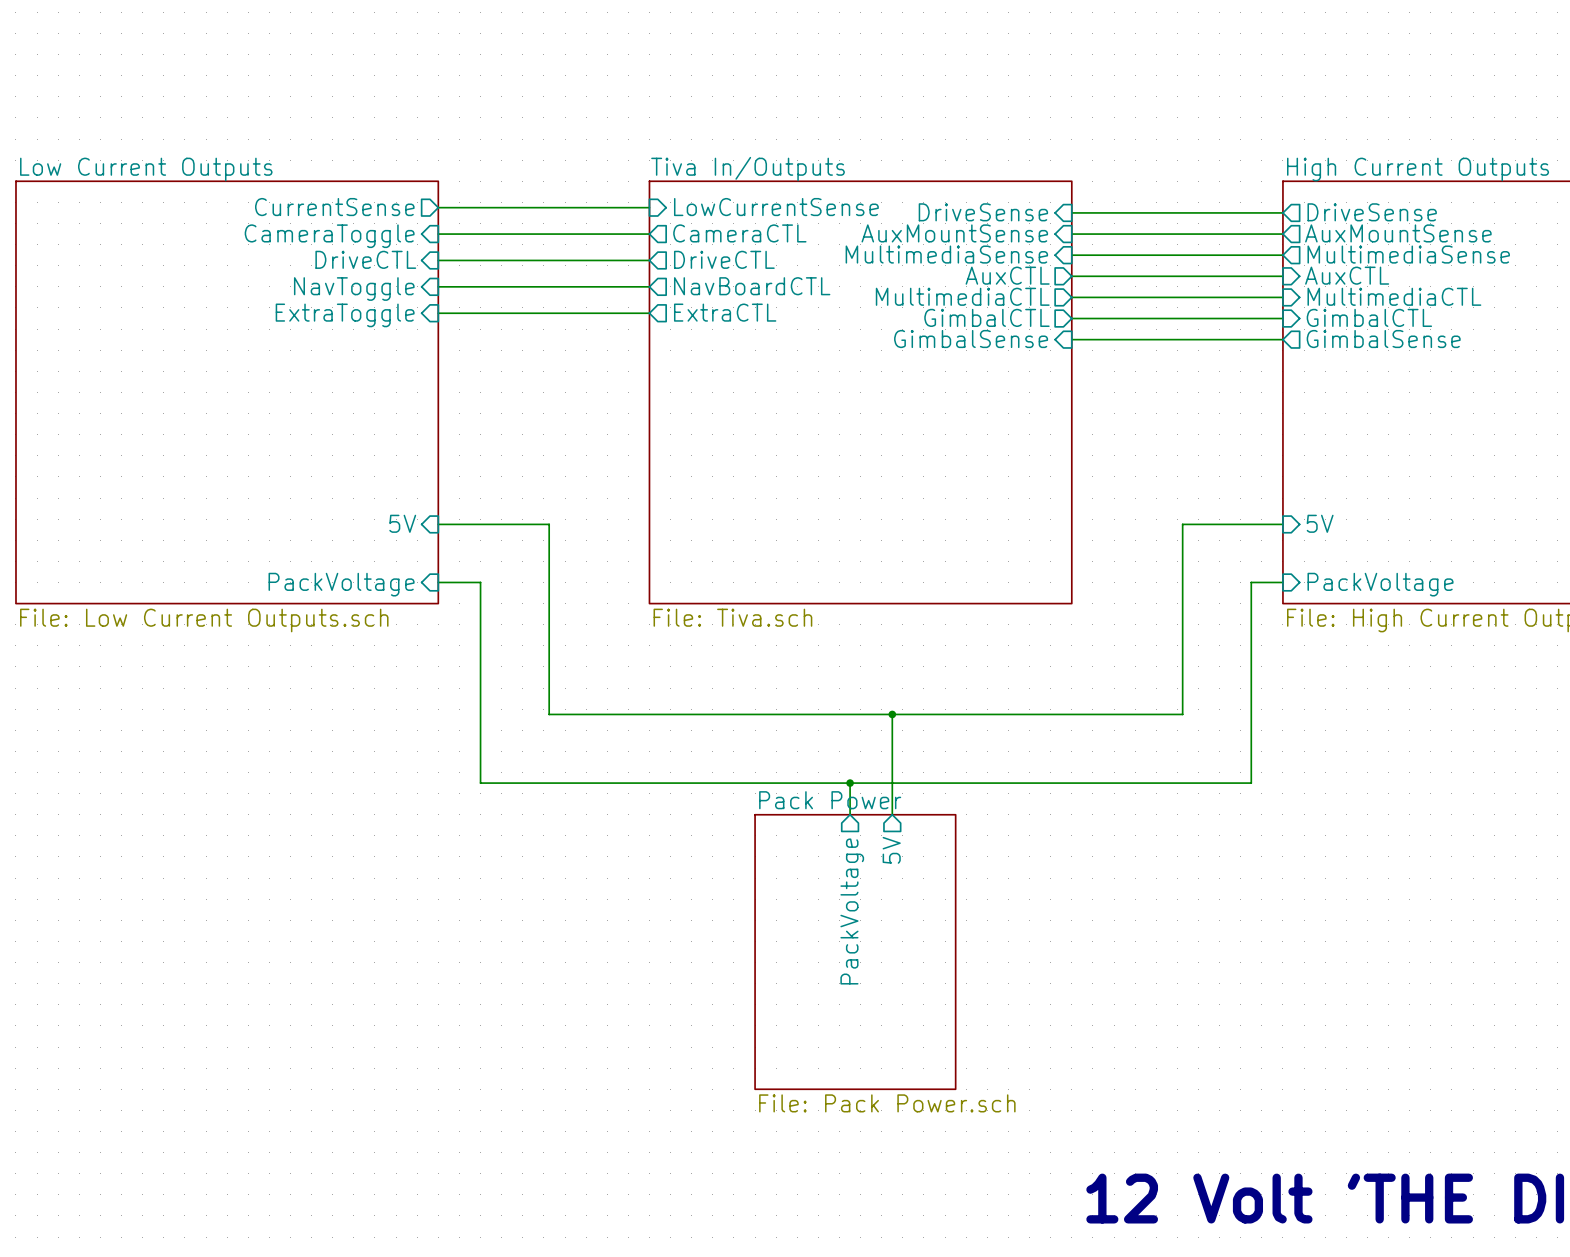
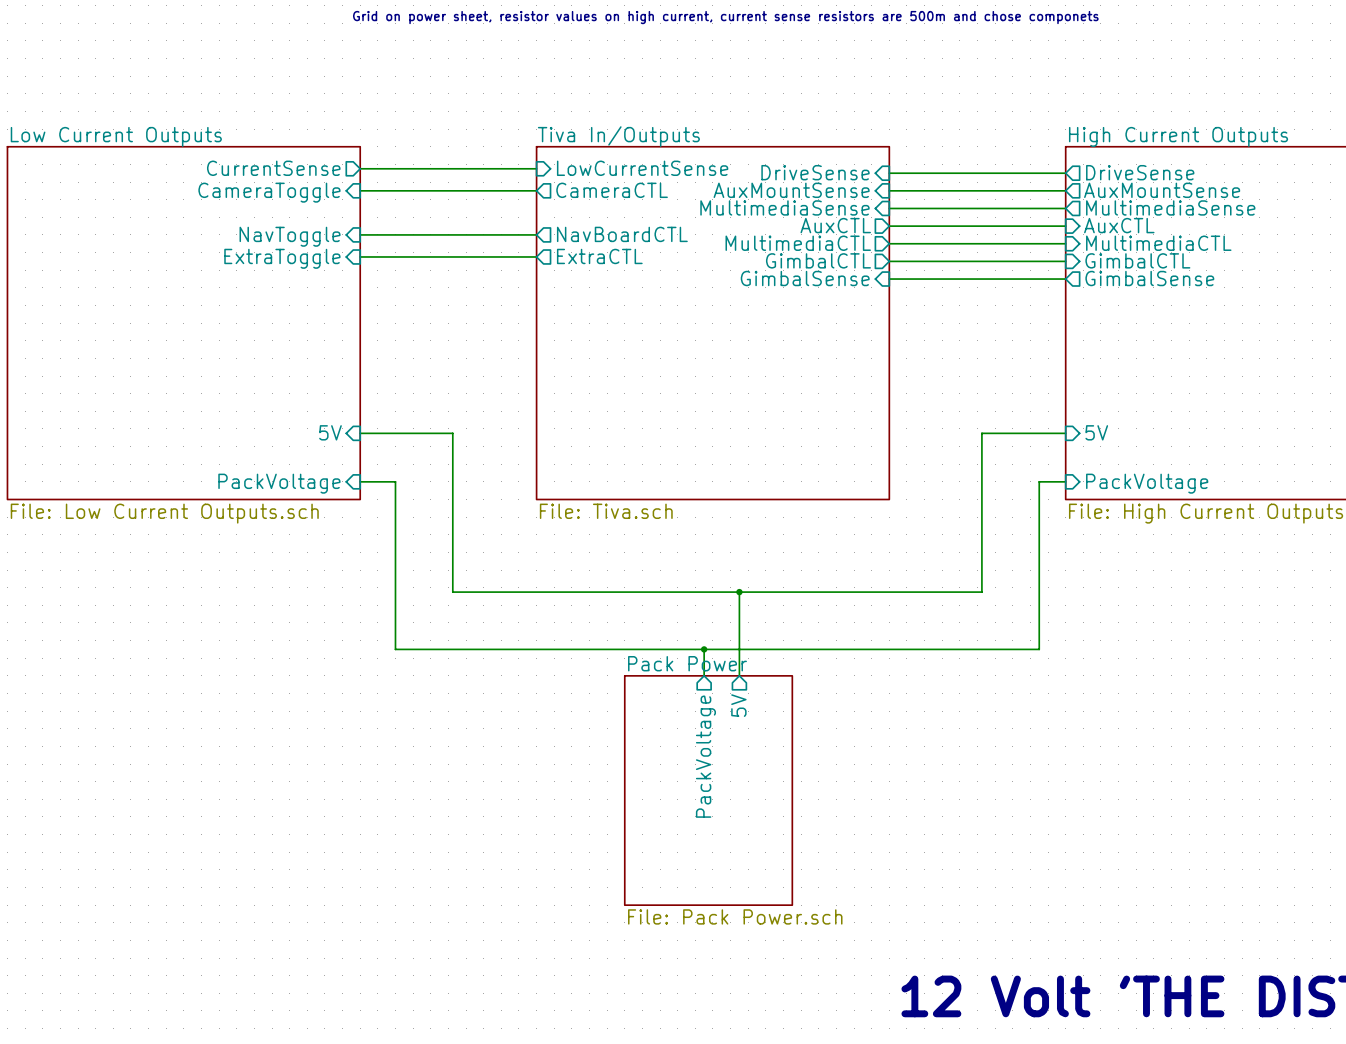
text: none -> Grid on power sheet, resistor values on high current, current sense resistors are 500m and chose componets (725, 17)
sheet pin: DriveCTL (365, 259) -> none
sheet pin: DriveCTL (724, 259) -> none
wire: (438, 260) (649, 260) -> none

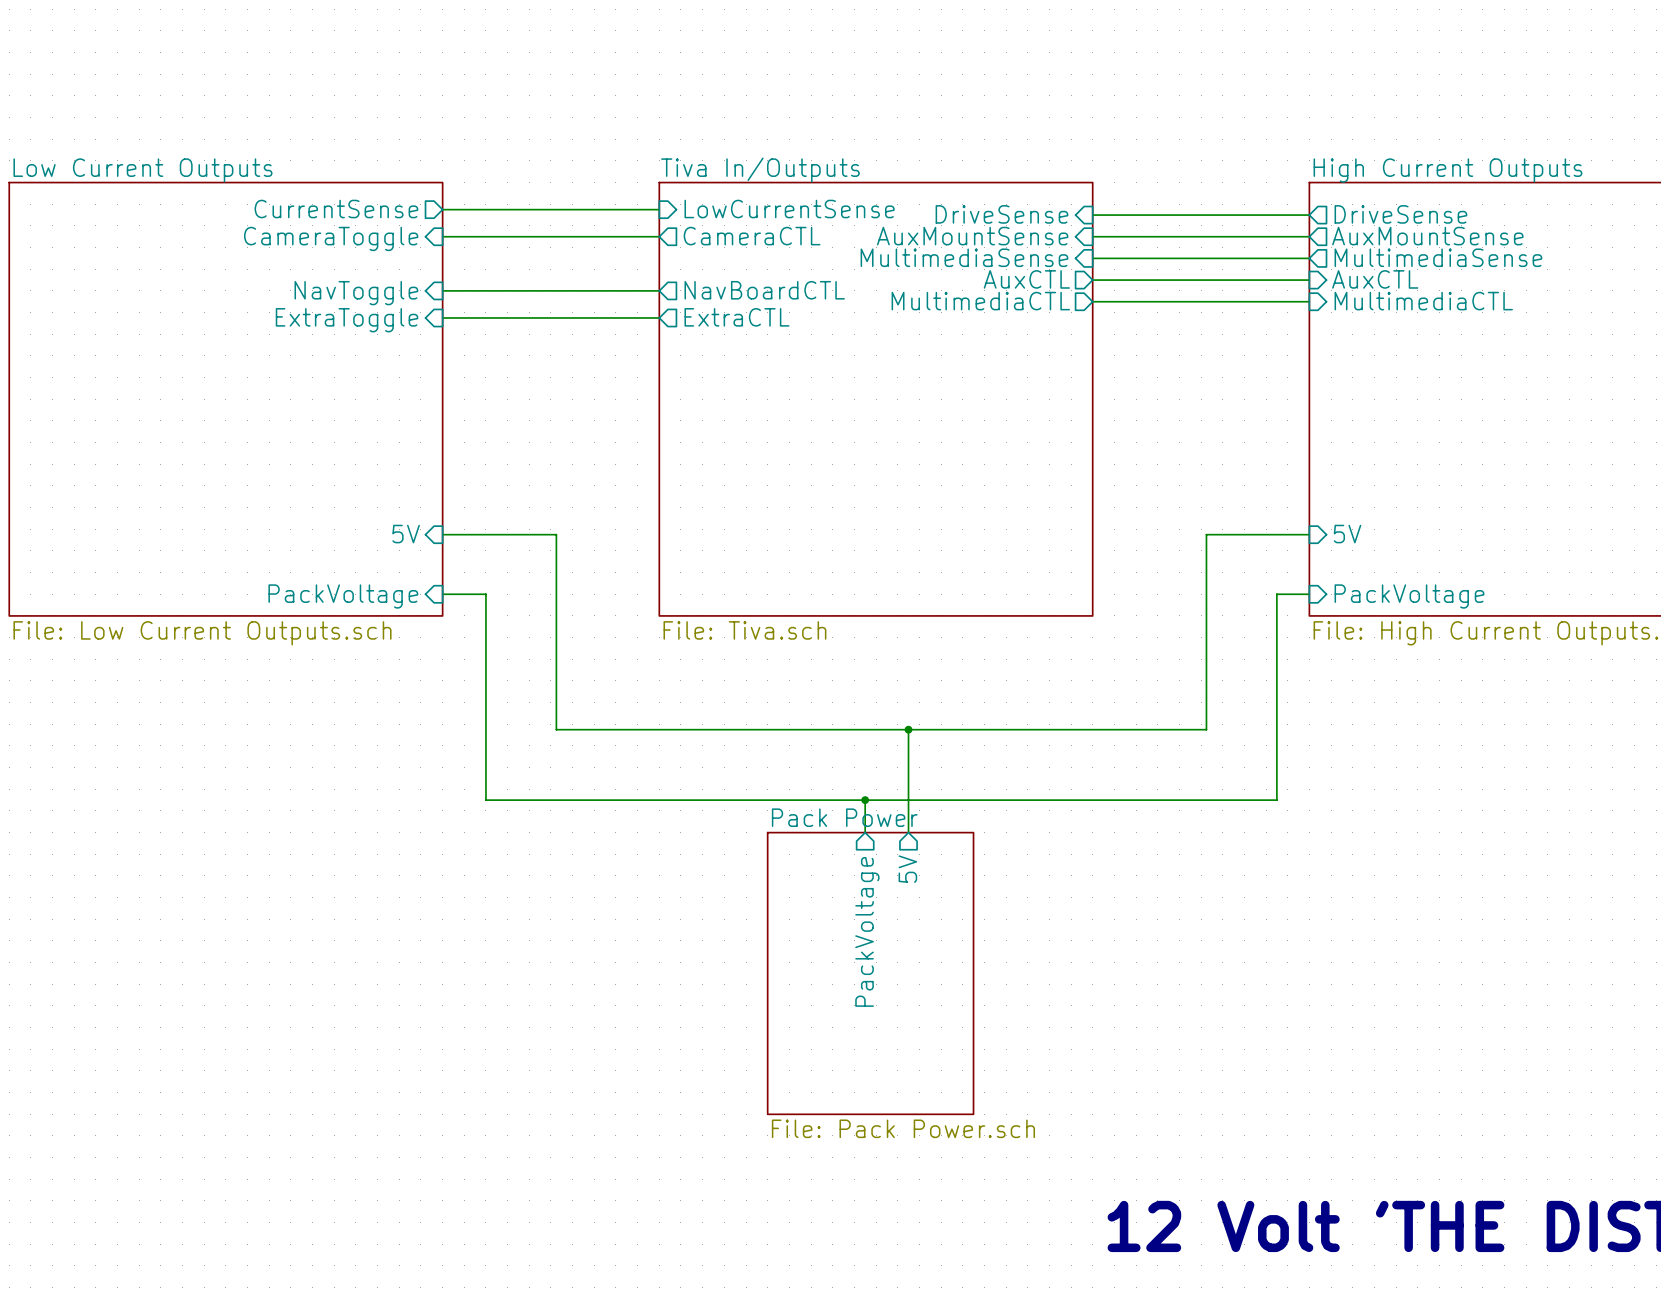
text: Grid on power sheet, resistor values on high current, current sense resistors are 500m and chose componets (725, 17) -> none
sheet pin: GimbalCTL (818, 260) -> none
sheet pin: GimbalCTL (1137, 260) -> none
wire: (889, 261) (1065, 261) -> none
sheet pin: GimbalSense (805, 278) -> none
sheet pin: GimbalSense (1149, 278) -> none
wire: (889, 279) (1065, 279) -> none

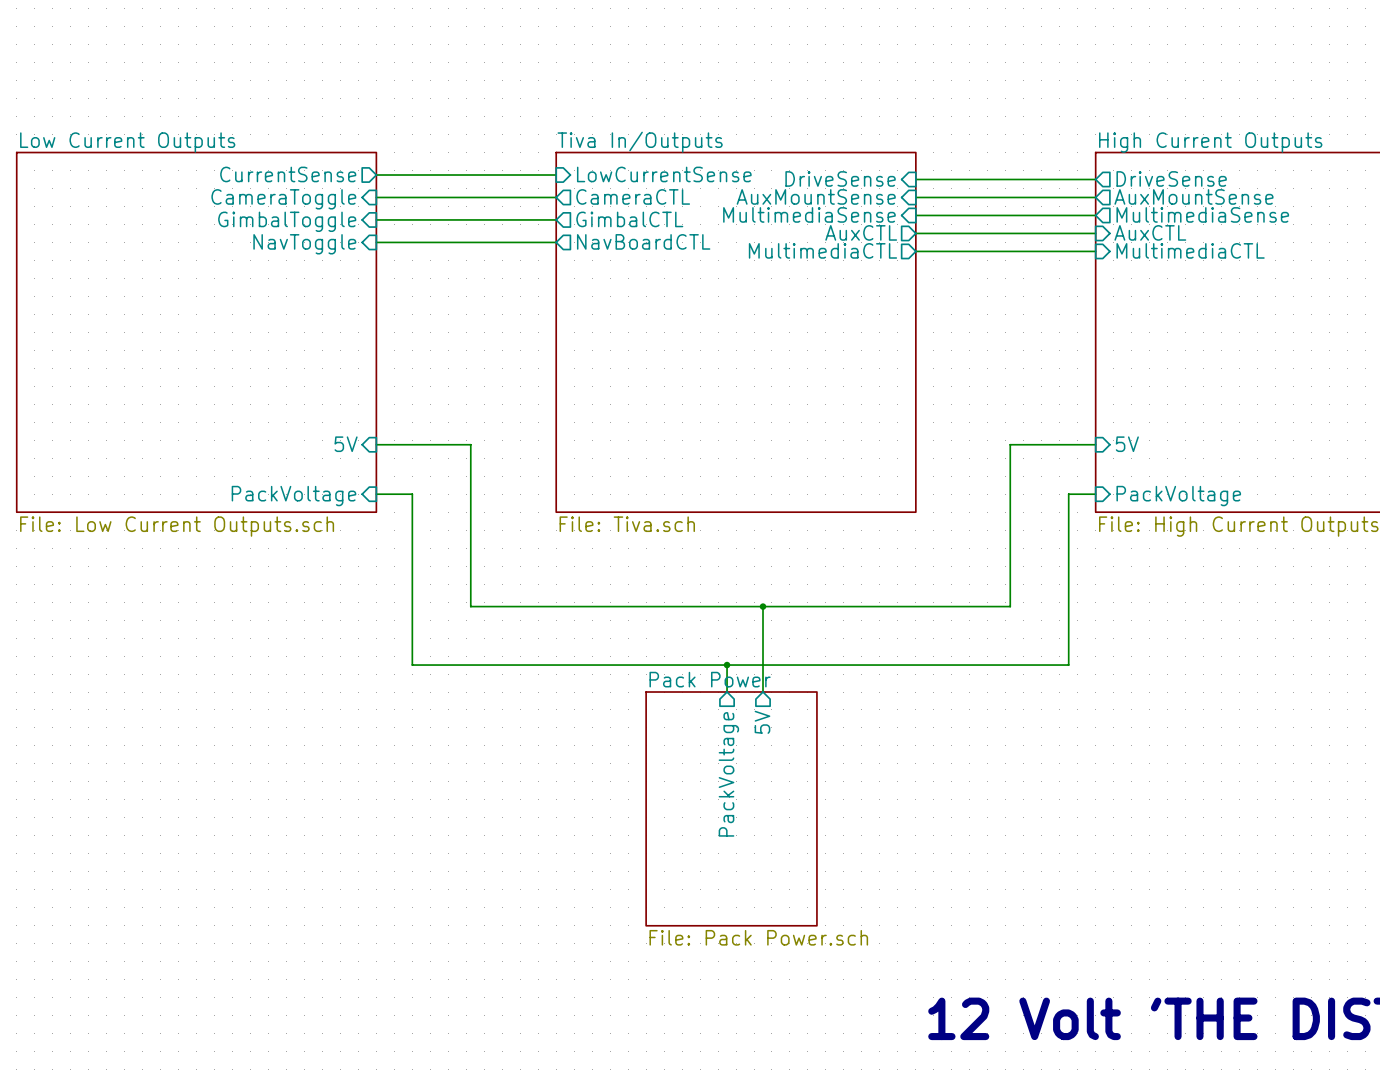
sheet pin: none -> GimbalCTL (629, 219)
sheet pin: none -> GimbalToggle (287, 221)
wire: (442, 317) (659, 317) -> (376, 219) (556, 219)
sheet pin: ExtraCTL (737, 317) -> none
sheet pin: ExtraToggle (347, 320) -> none

